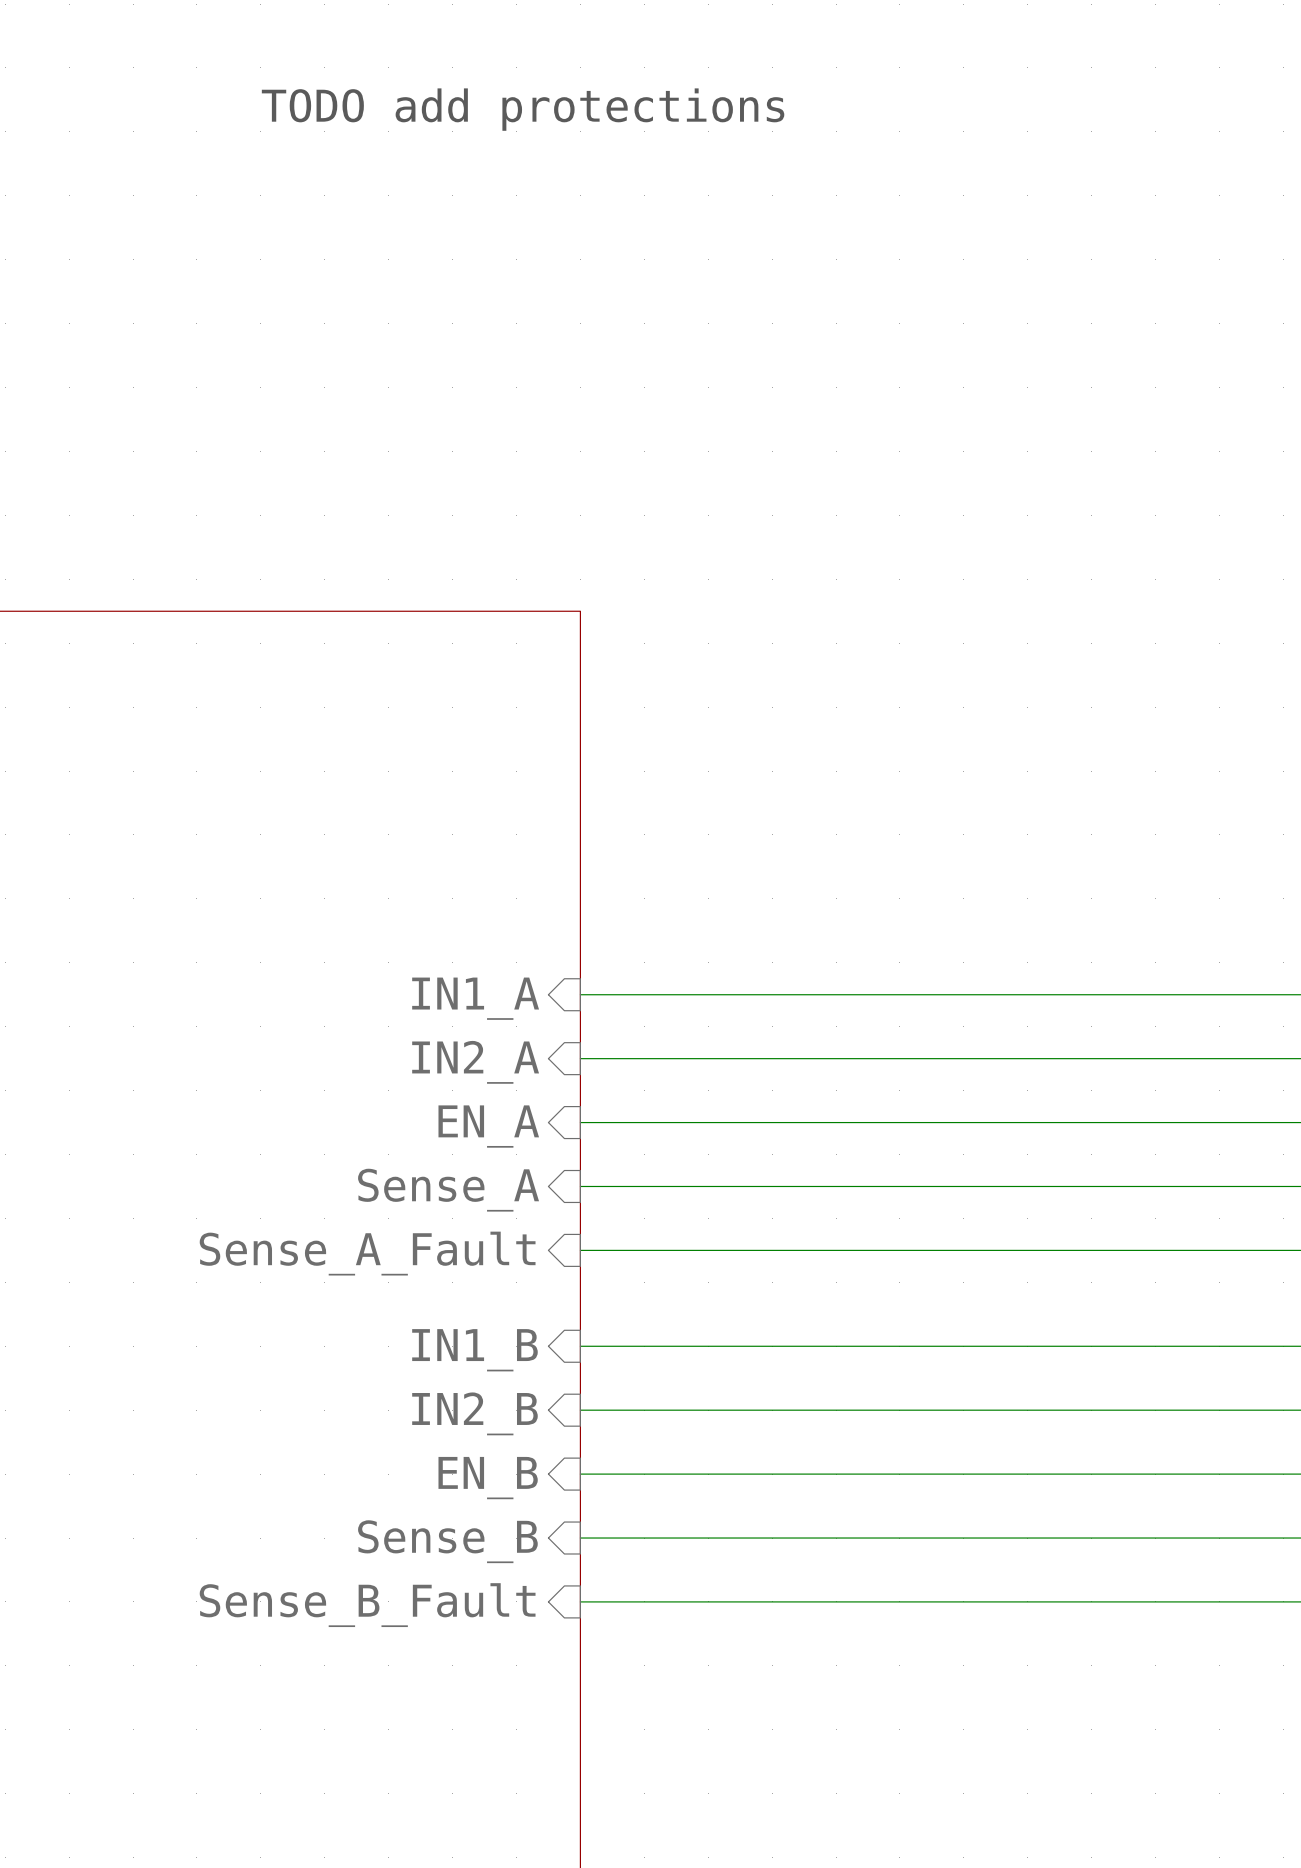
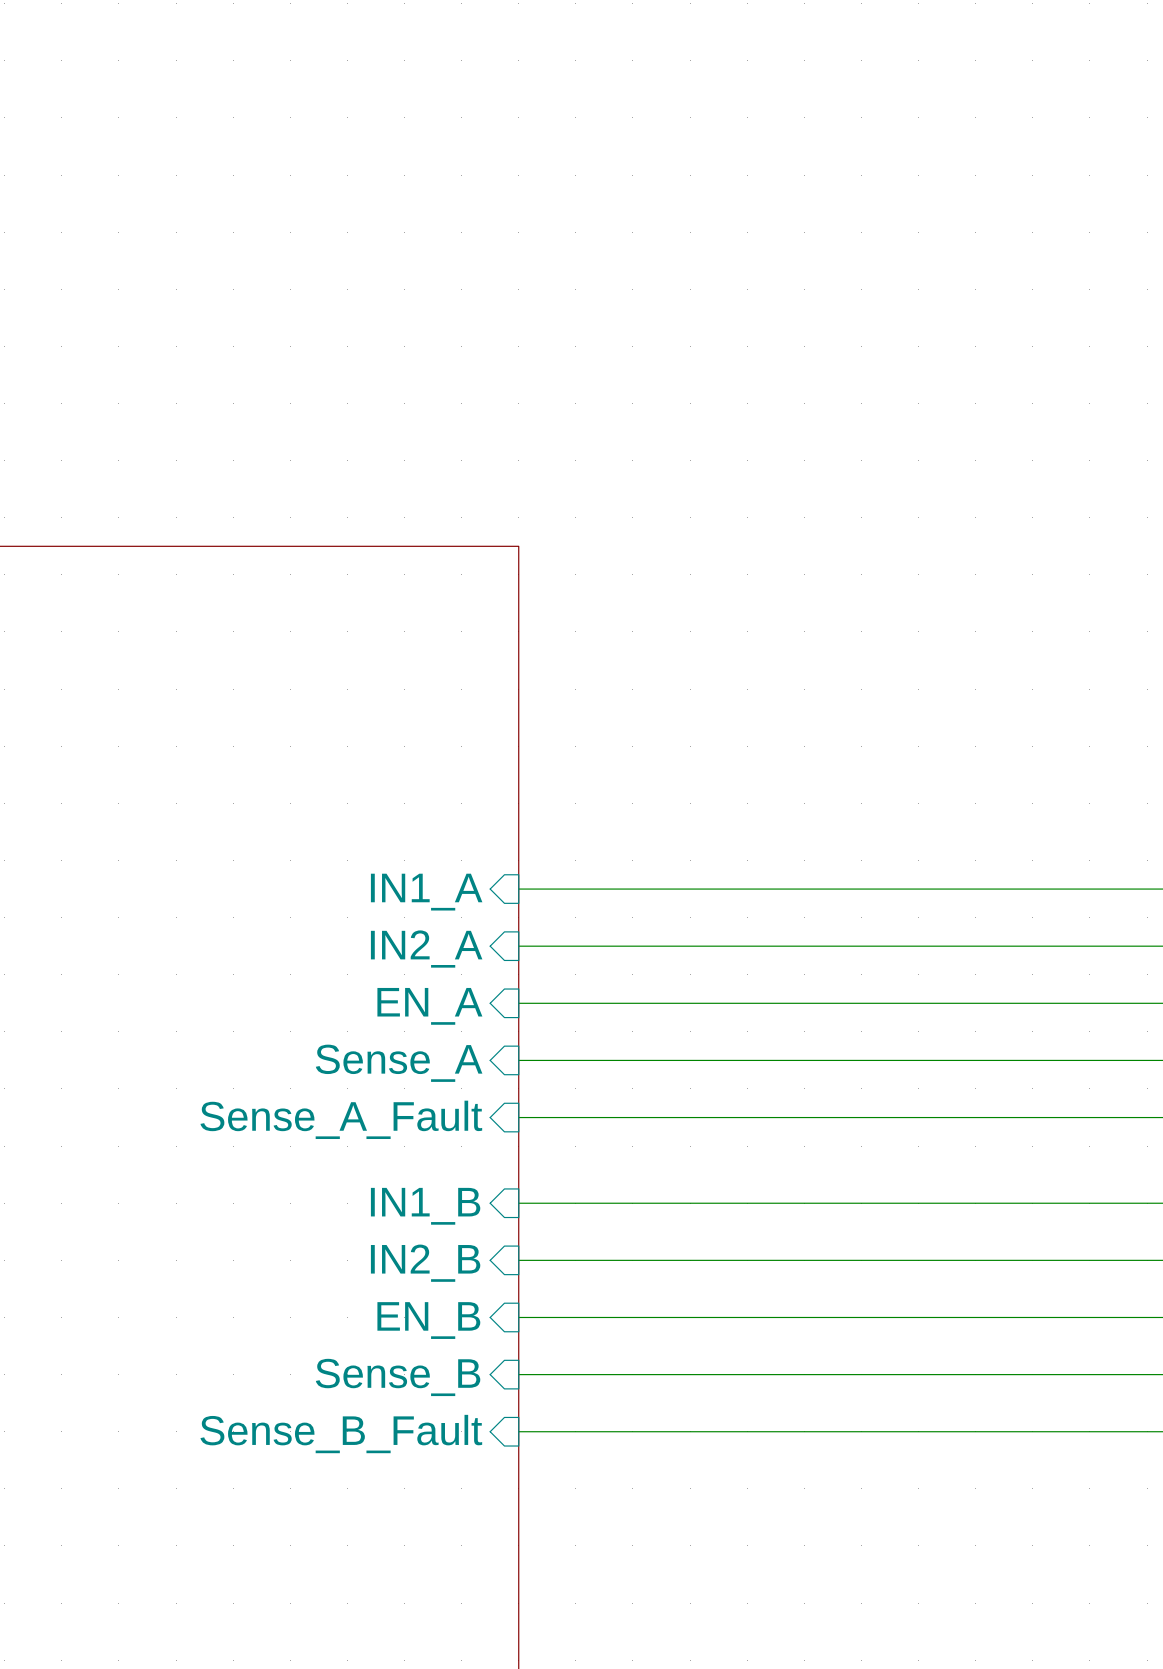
text: TODO add protections (523, 109) -> none

